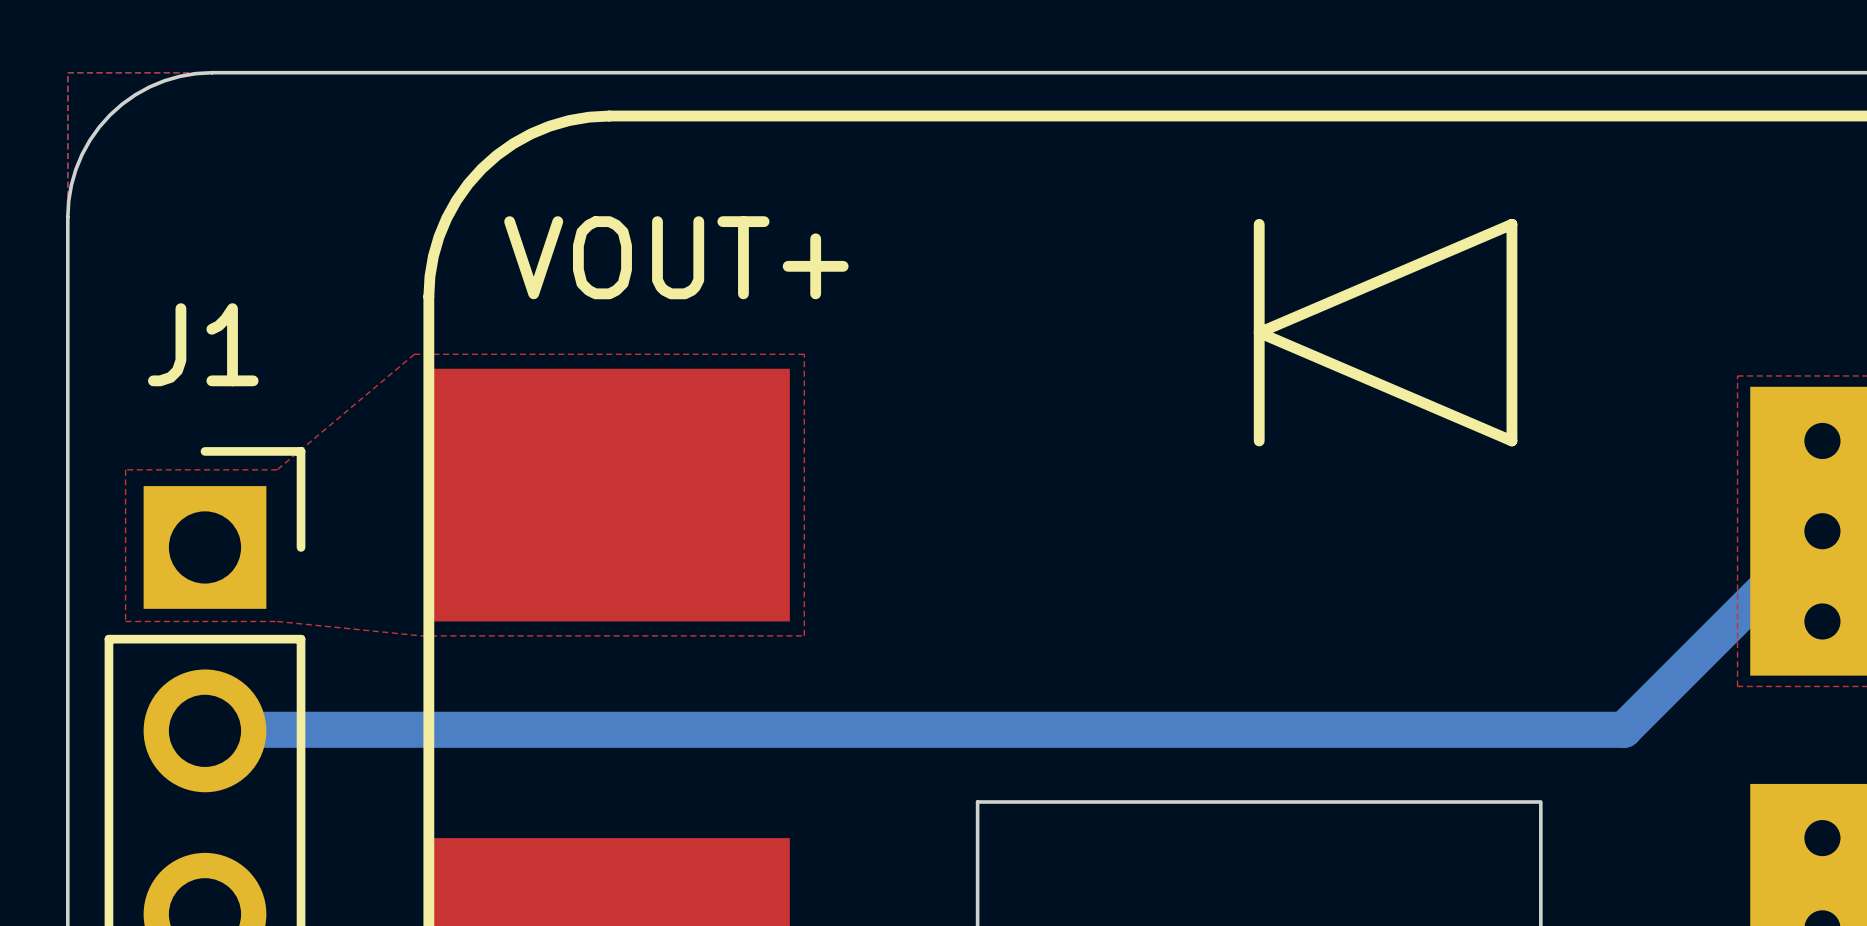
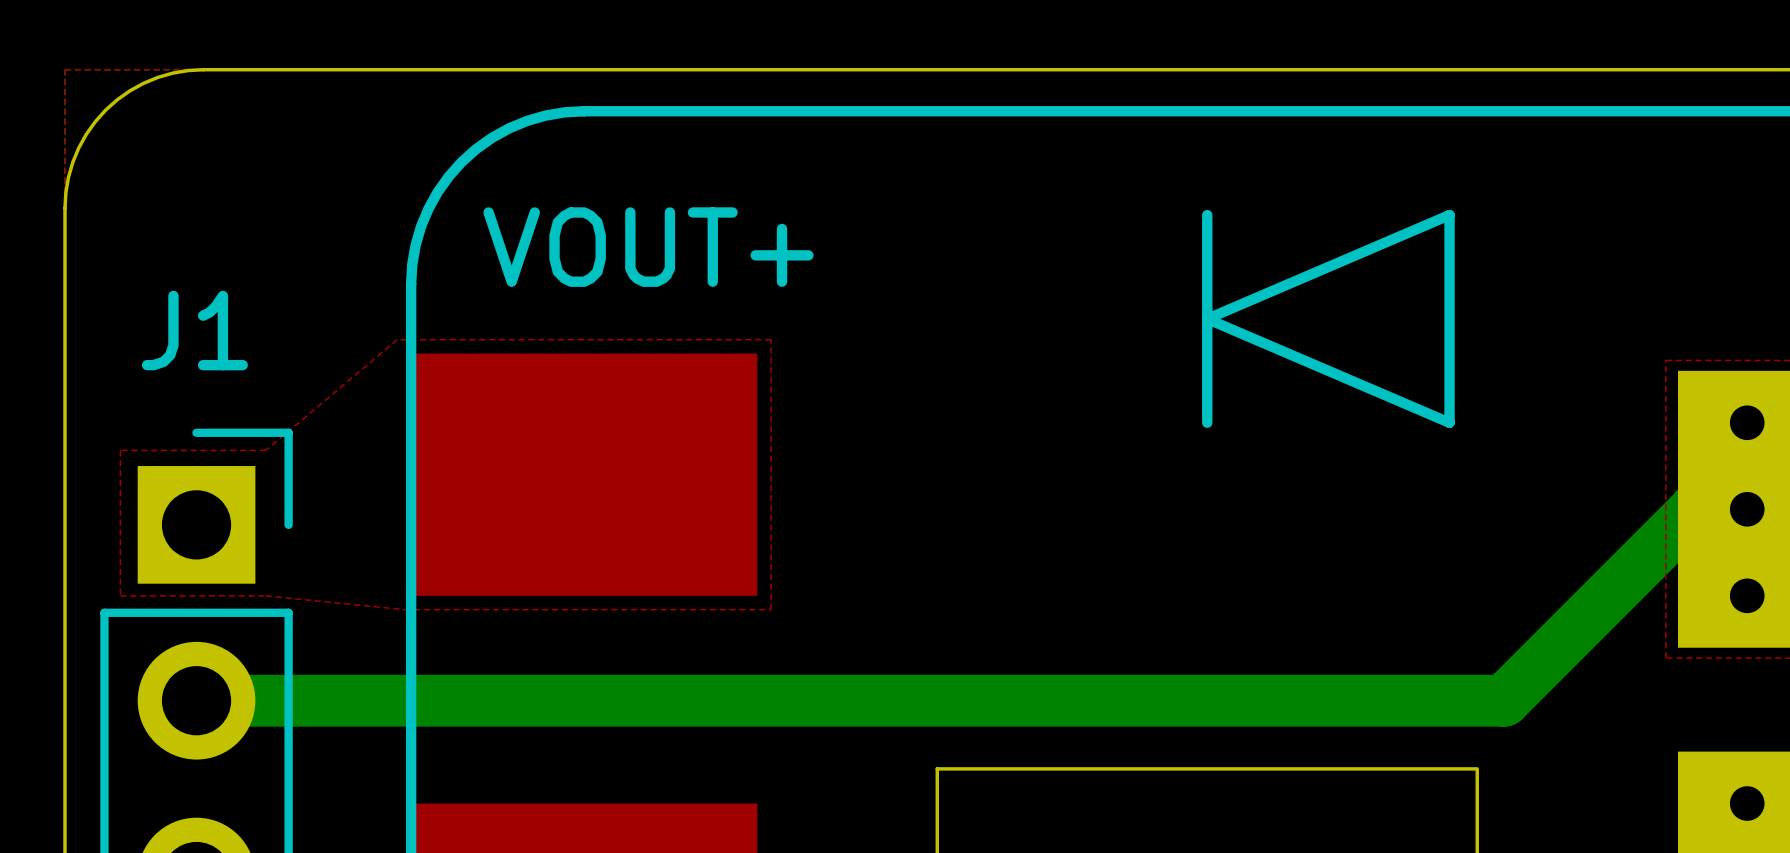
bottom track: (1822, 531) (1623, 729) (204, 730) -> (1747, 509) (1695, 509) (1503, 700) (196, 700)

